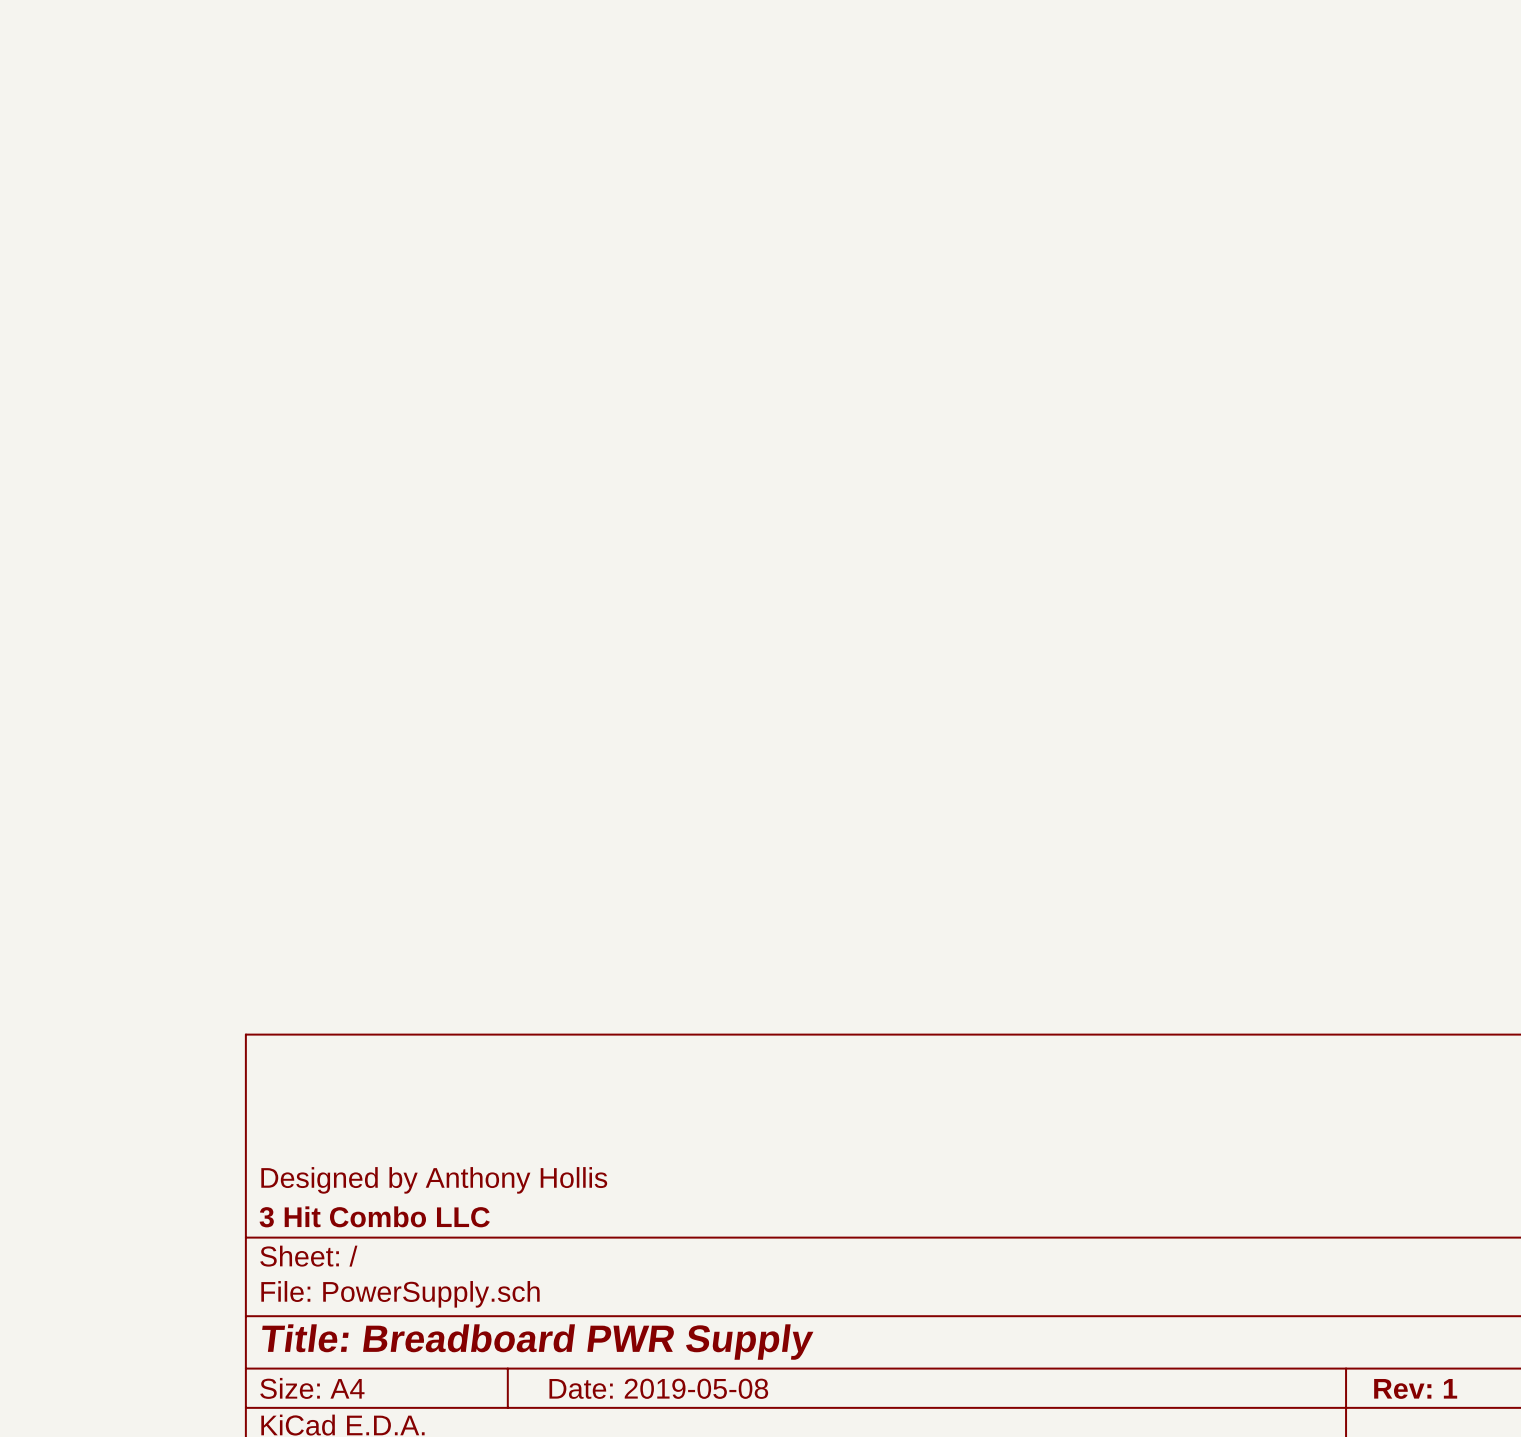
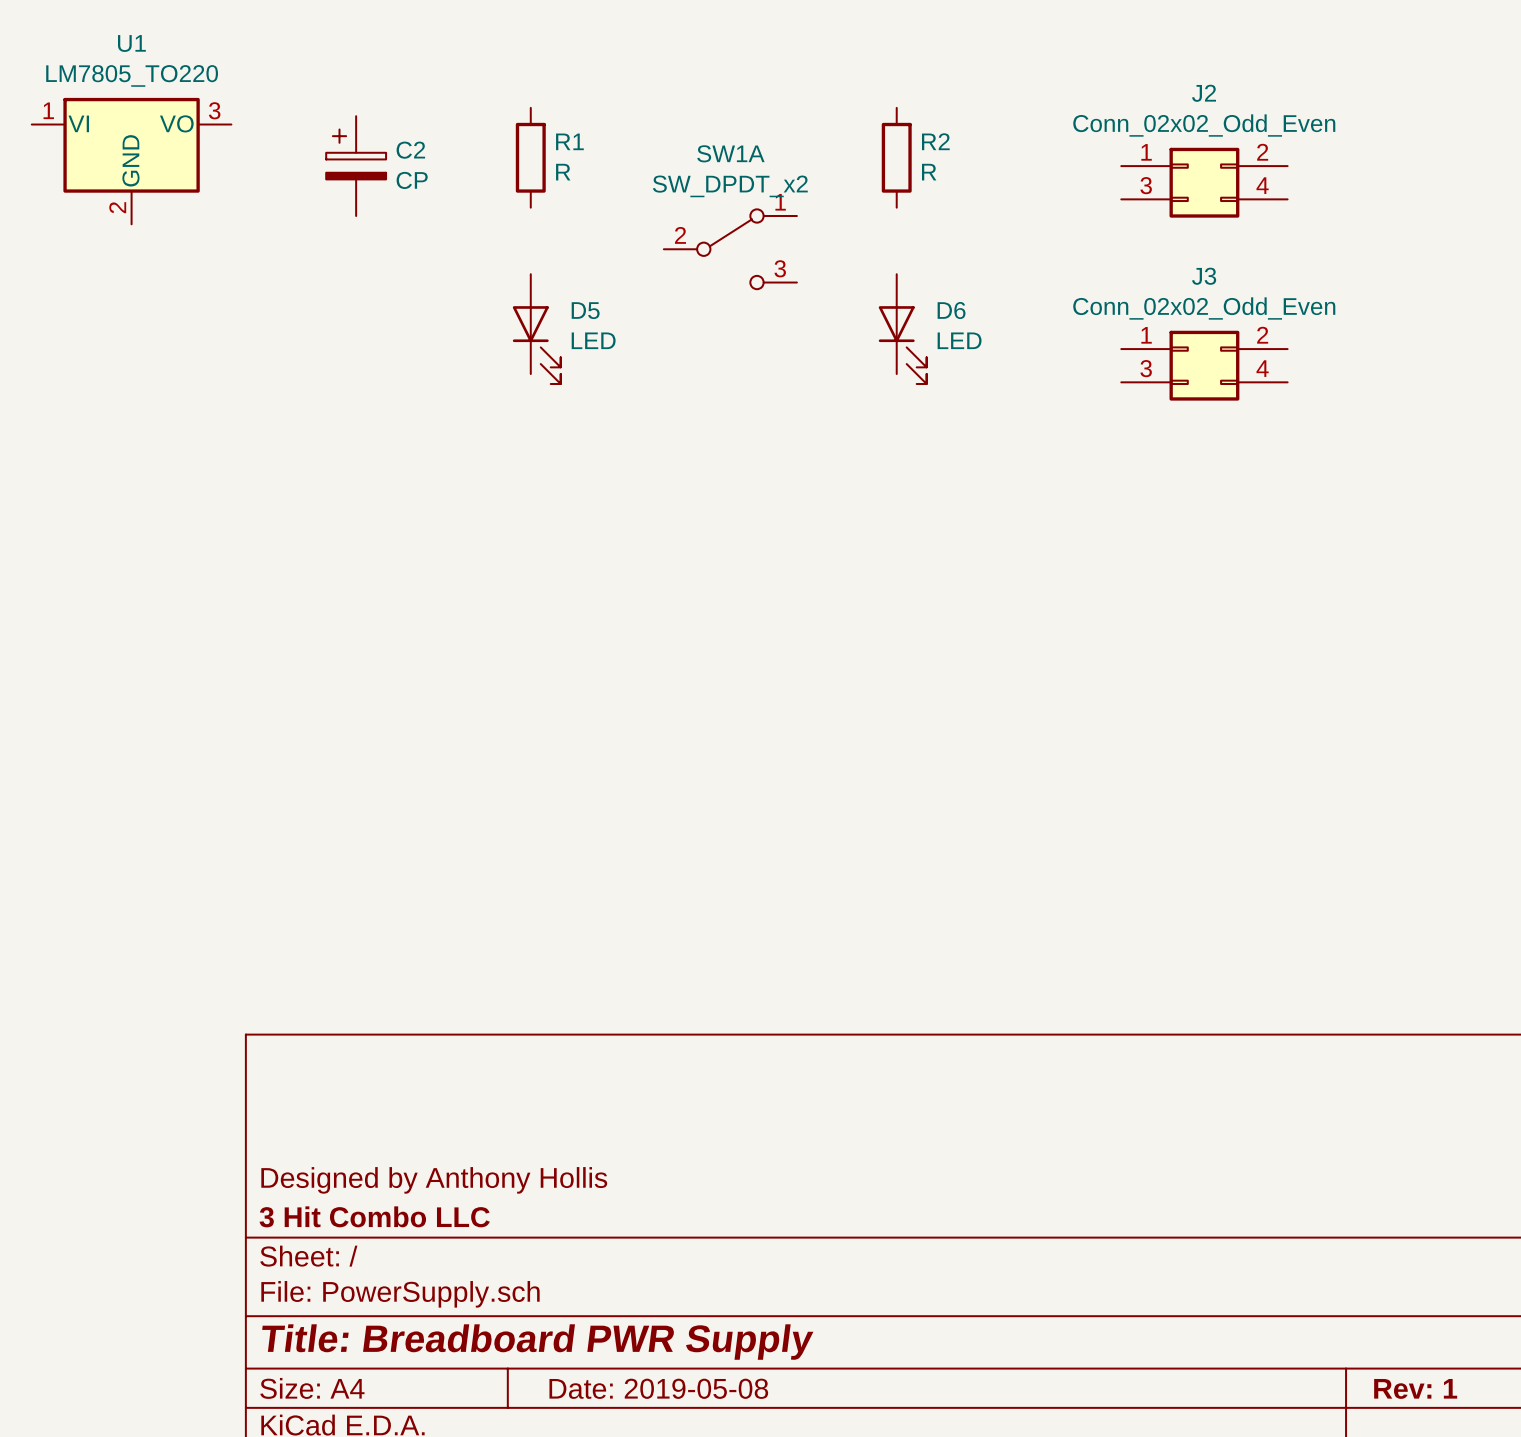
R1: none -> R (530, 157)
R2: none -> R (896, 157)
U1: none -> LM7805_TO220 (131, 161)
C2: none -> CP (356, 166)
J2: none -> Conn_02x02_Odd_Even (1204, 182)
SW1A: none -> SW_DPDT_x2 (730, 249)
D5: none -> LED (536, 329)
D6: none -> LED (902, 329)
J3: none -> Conn_02x02_Odd_Even (1204, 365)

